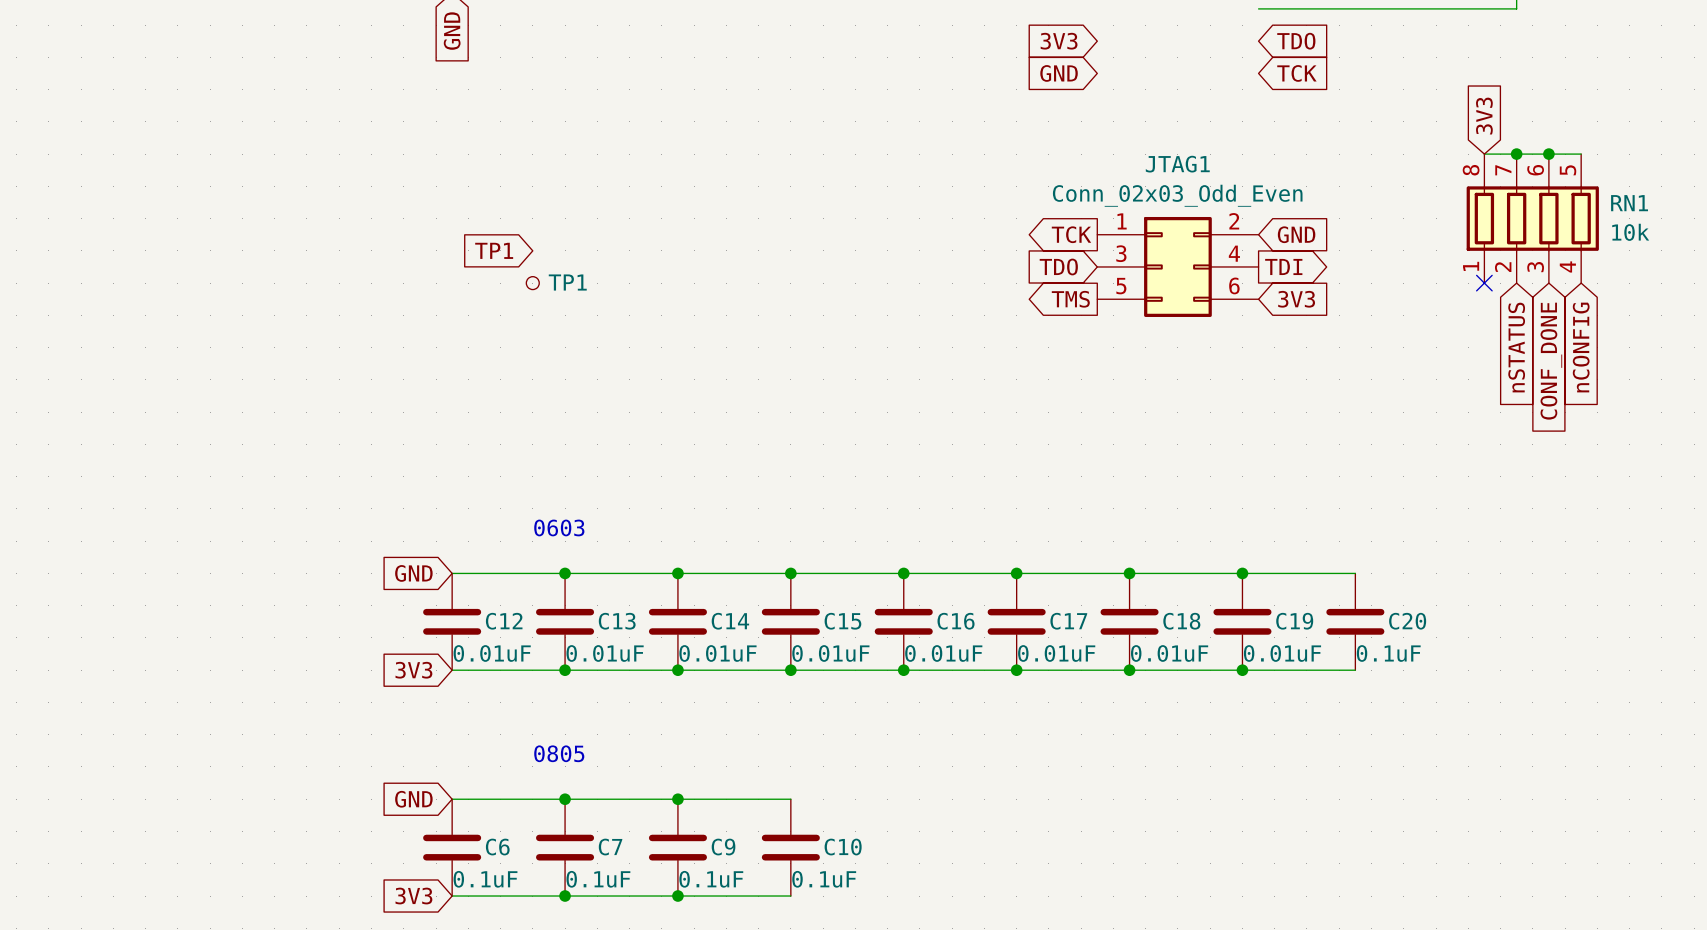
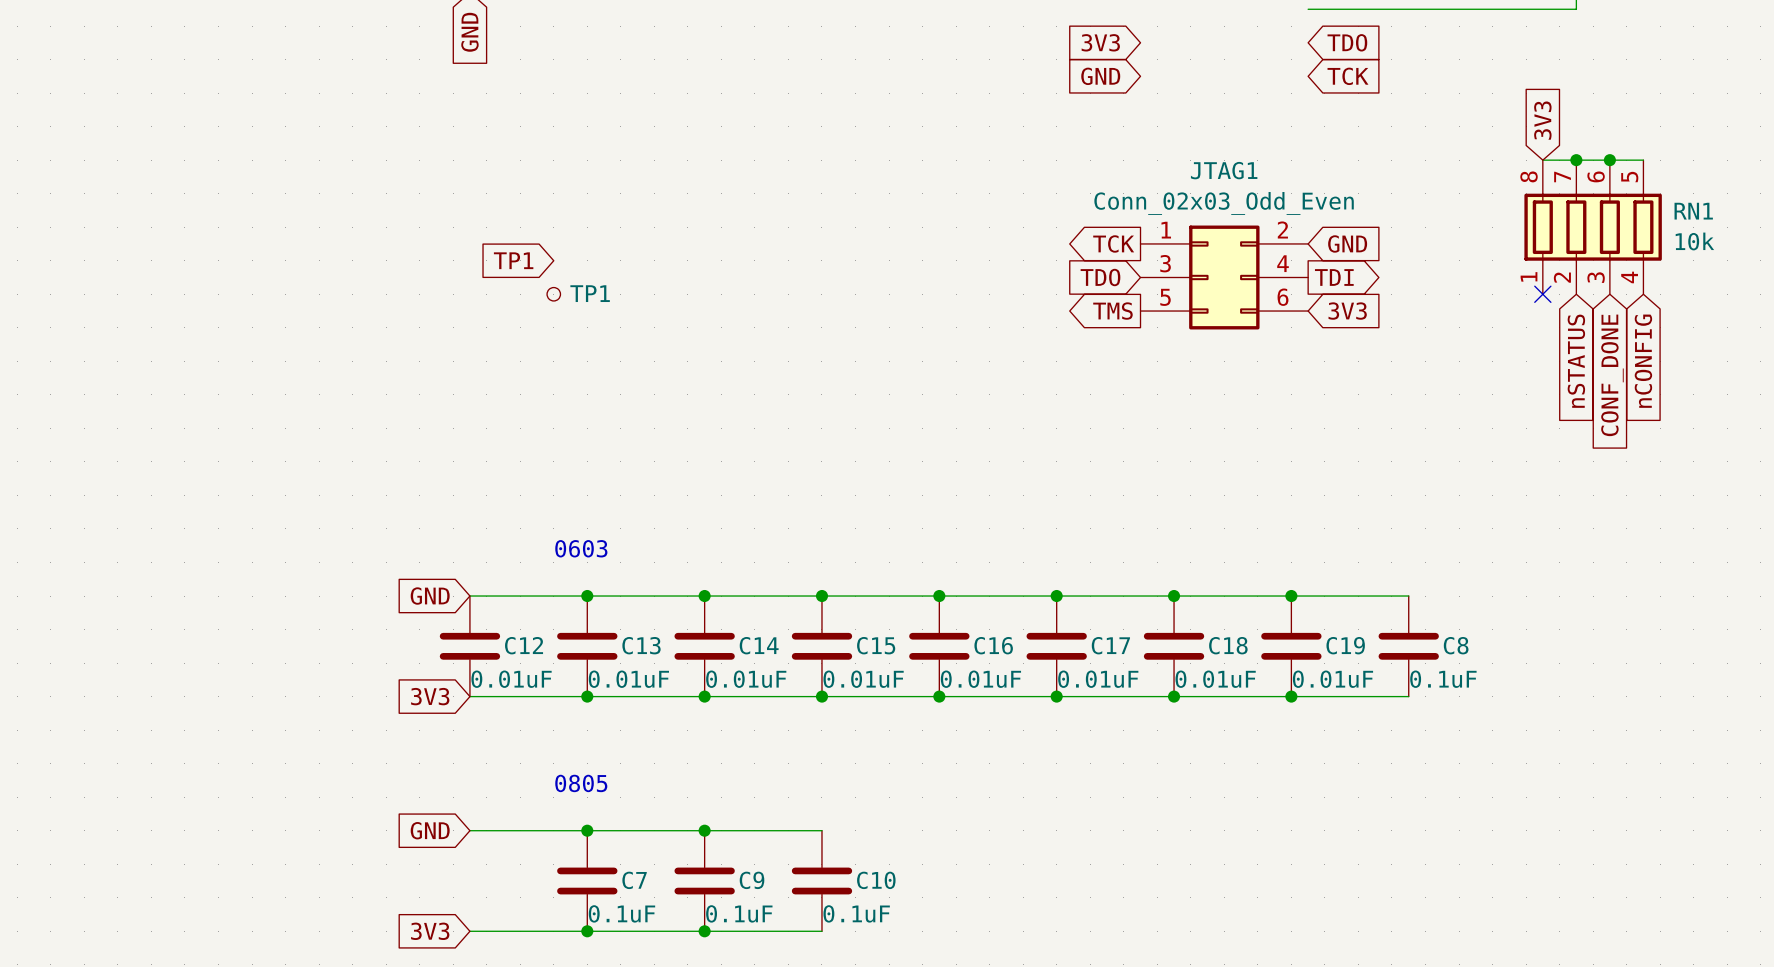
C20 name: C20 (1407, 621) -> C8 (1456, 645)
C6: 0.1uF (452, 847) -> none

